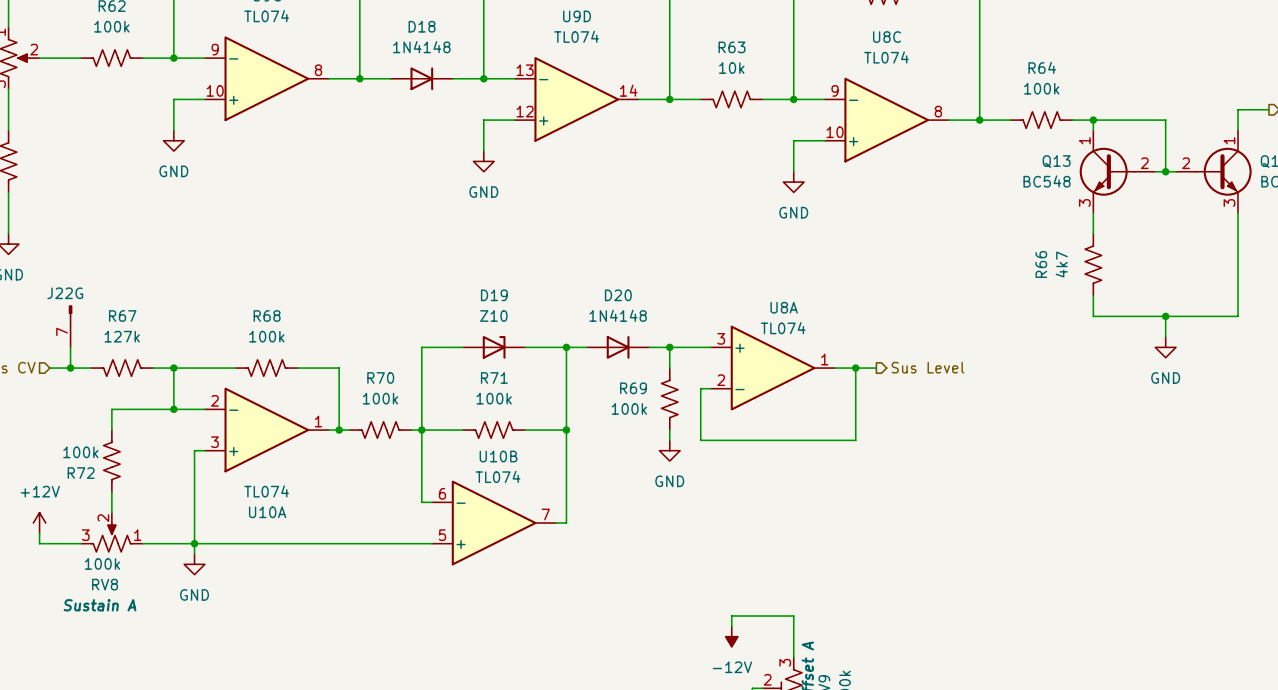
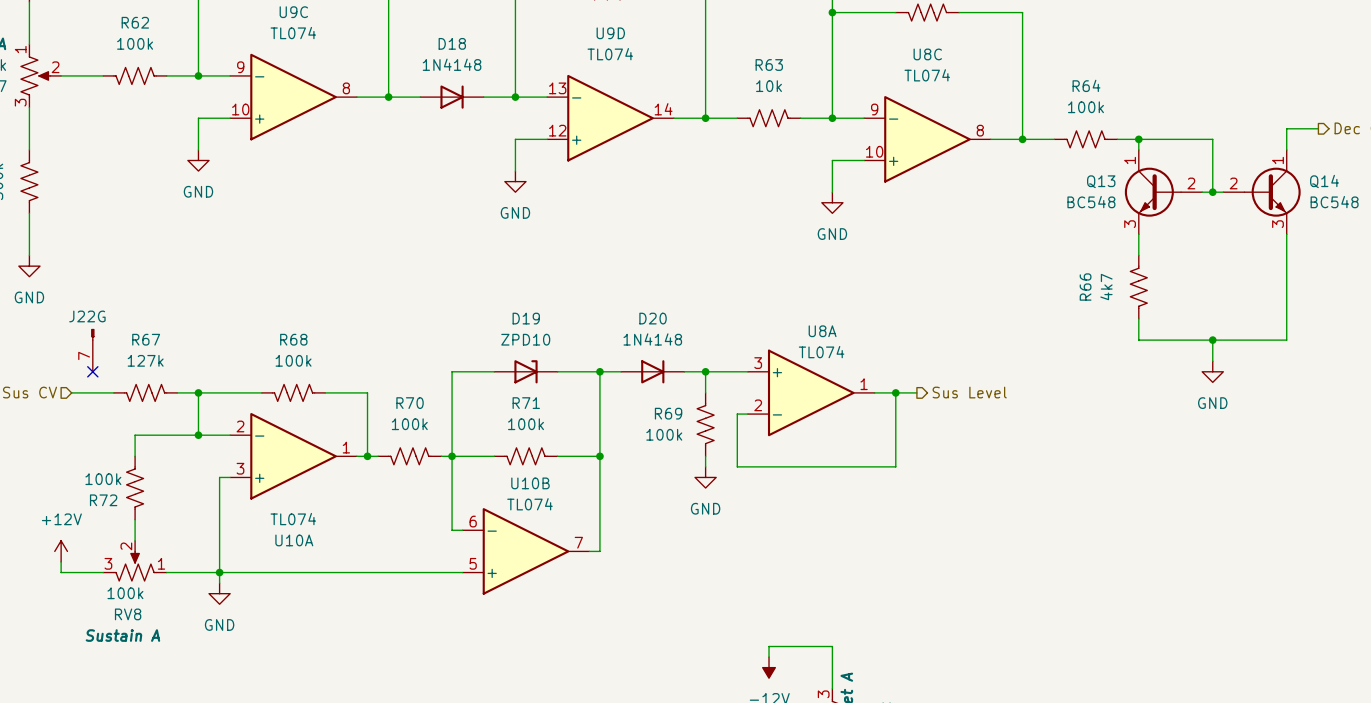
D19 value: Z10 (493, 316) -> ZPD10 (525, 339)
wire: (70, 347) (70, 368) -> none
no-connect mark: none -> (92, 371)
junction: (70, 368) -> none

